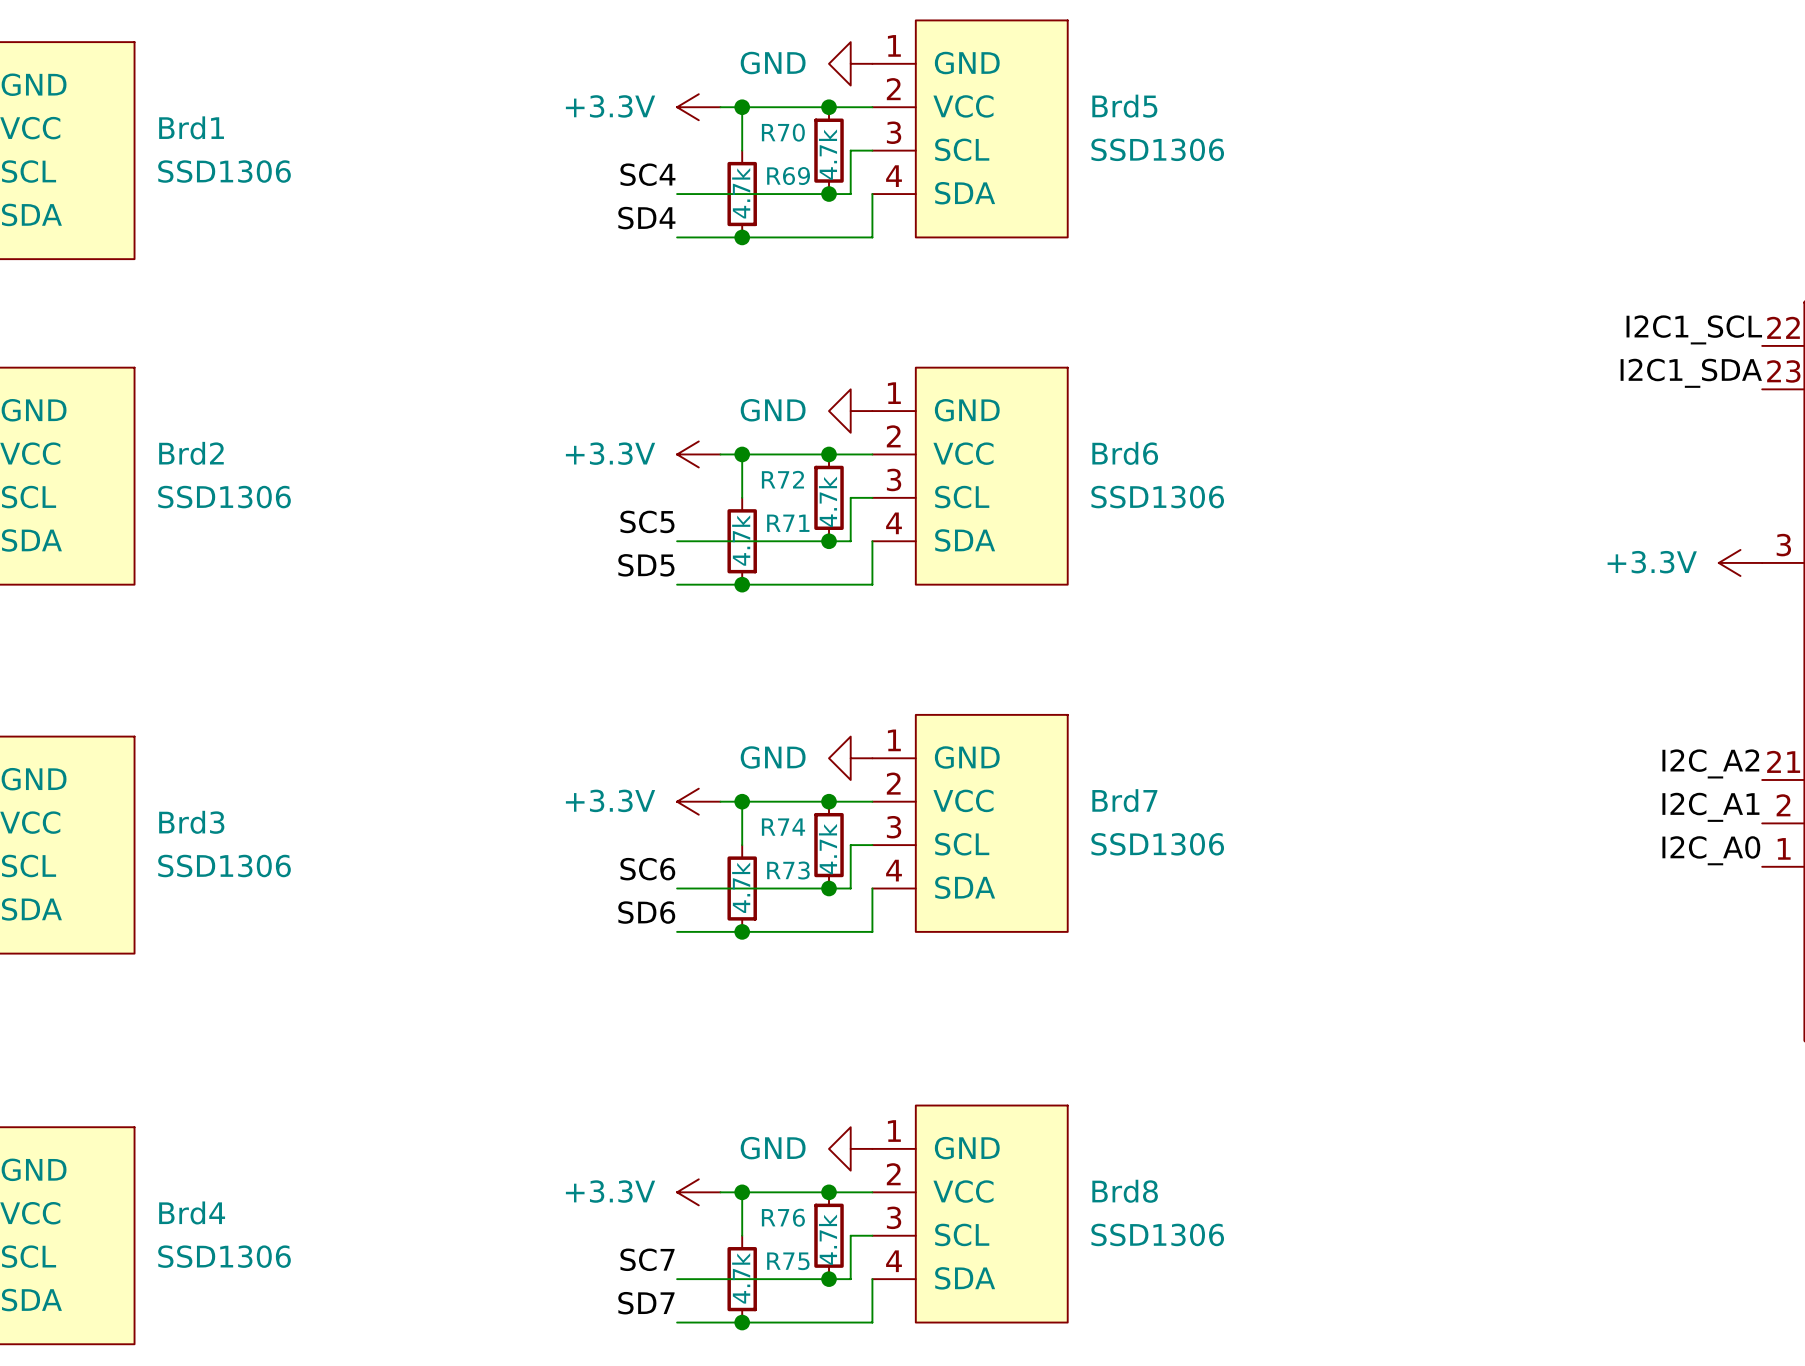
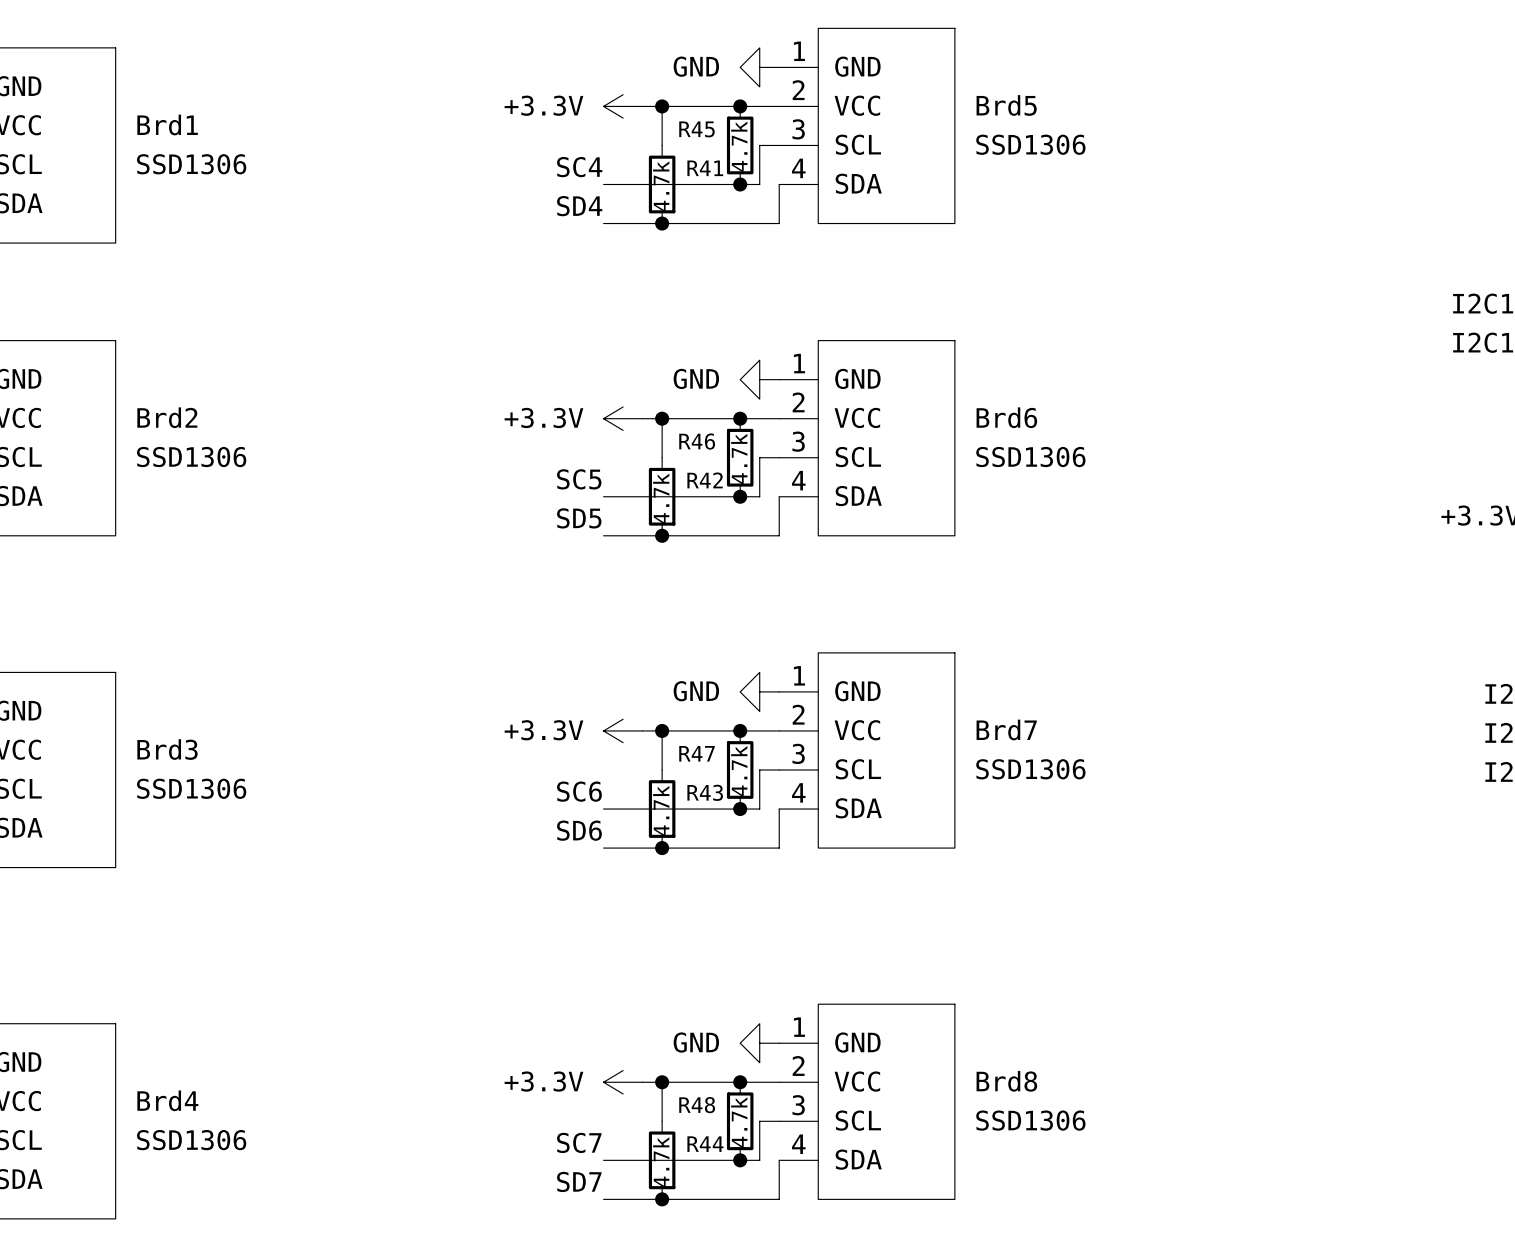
R70 name: R70 (783, 132) -> R45 (696, 129)
R69 name: R69 (788, 176) -> R41 (705, 168)
R72 name: R72 (782, 479) -> R46 (697, 441)
R71 name: R71 (788, 523) -> R42 (705, 480)
R74 name: R74 (783, 827) -> R47 (697, 753)
R73 name: R73 (788, 870) -> R43 (705, 792)
R76 name: R76 (783, 1217) -> R48 (697, 1105)
R75 name: R75 (788, 1261) -> R44 (705, 1144)

